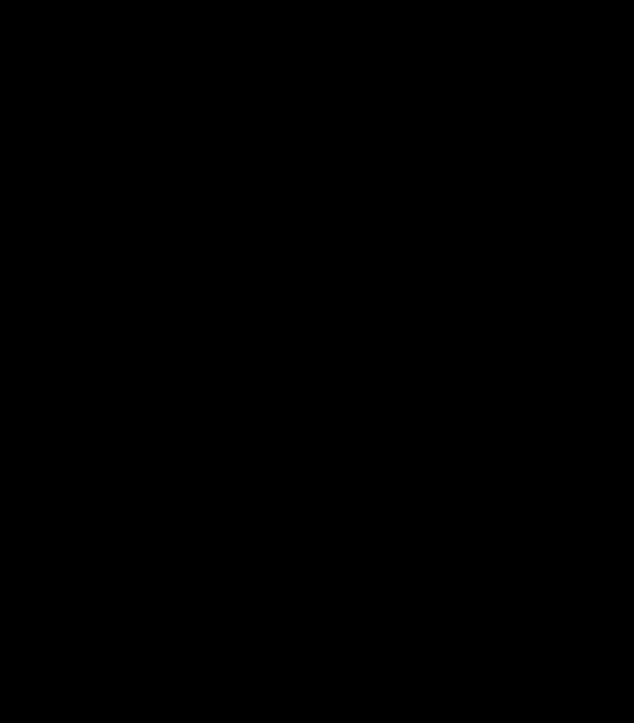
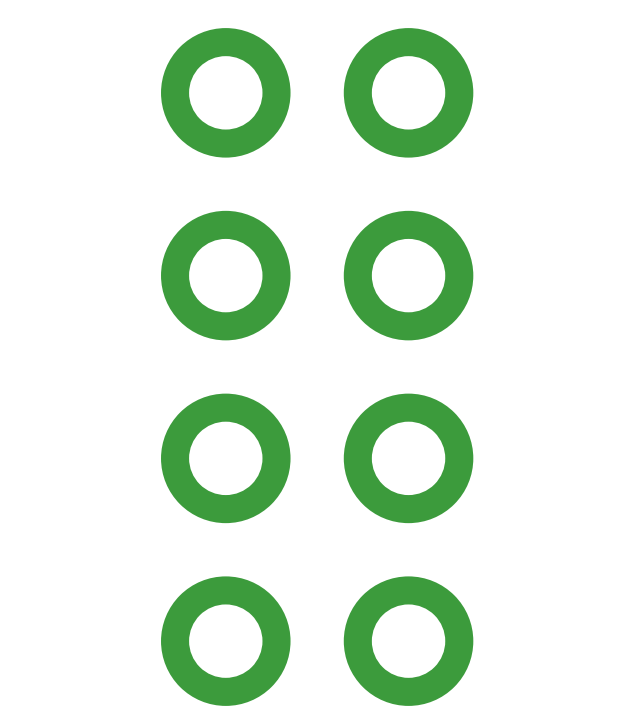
part: none -> (317, 366)

